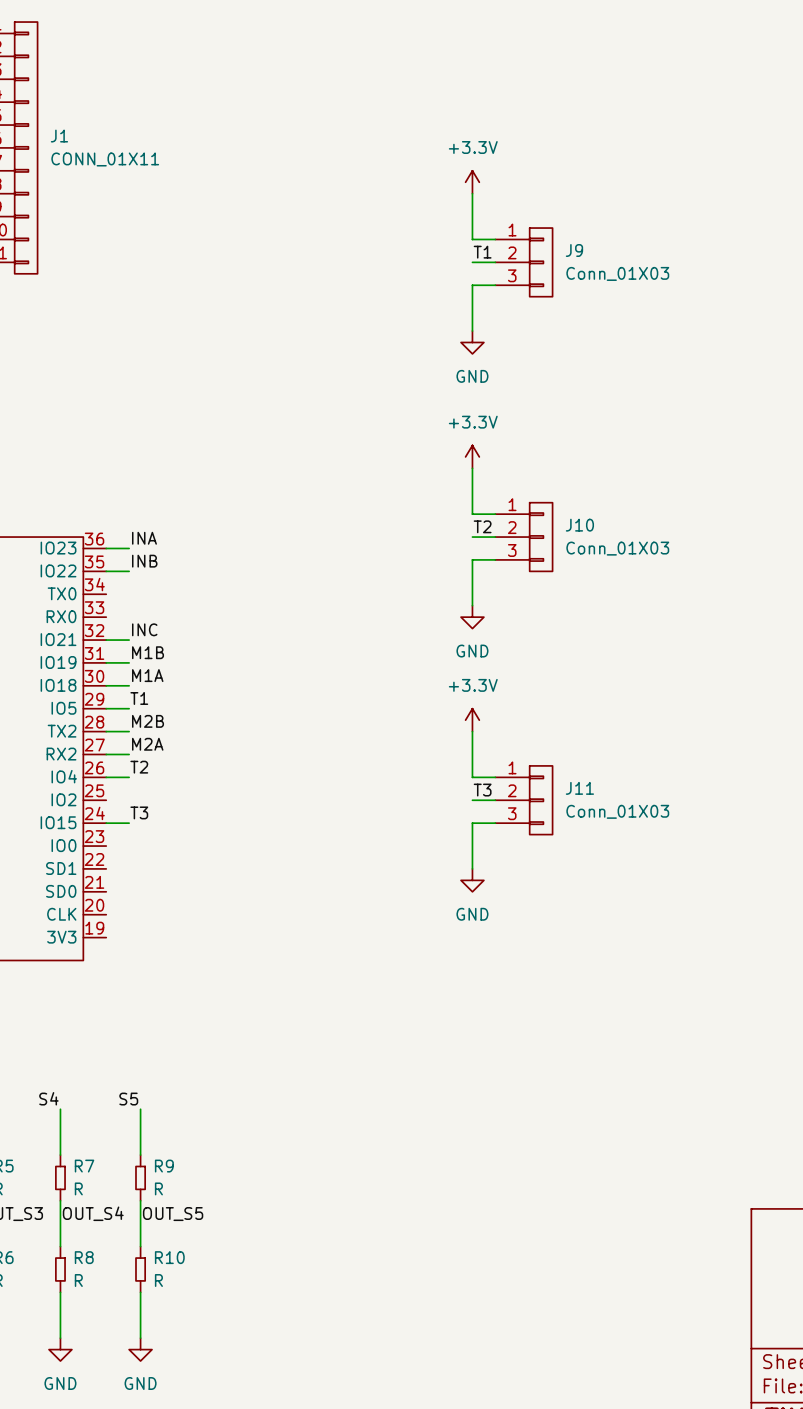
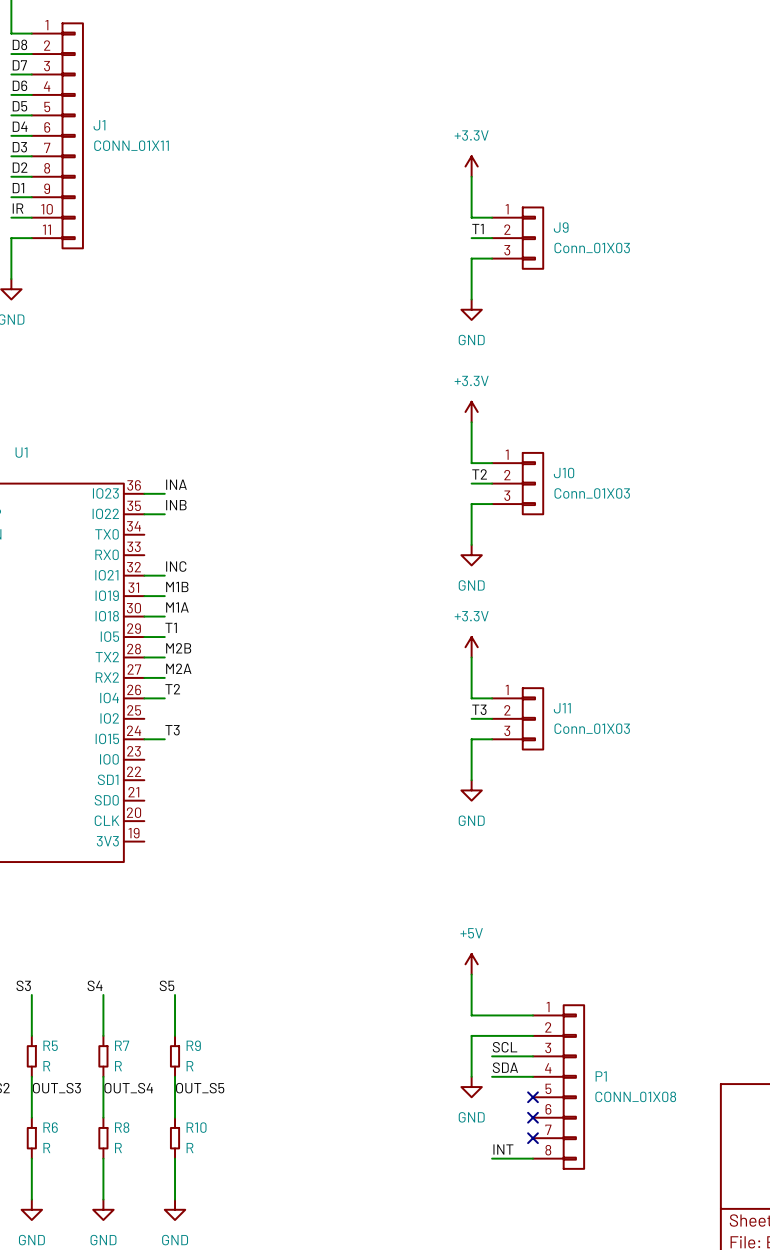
power symbol: none -> +5V (471, 964)
wire: none -> (471, 974) (471, 1015) (532, 1015)
wire: none -> (532, 1035) (471, 1035) (471, 1076)
label: none -> SCL (505, 1047)
wire: none -> (492, 1056) (532, 1056)
label: none -> SDA (505, 1067)
wire: none -> (492, 1076) (532, 1076)
power symbol: none -> GND (471, 1087)
P1: none -> CONN_01X08 (558, 1087)
no-connect mark: none -> (532, 1097)
no-connect mark: none -> (532, 1117)
no-connect mark: none -> (532, 1138)
label: none -> INT (503, 1149)
wire: none -> (492, 1158) (532, 1158)

